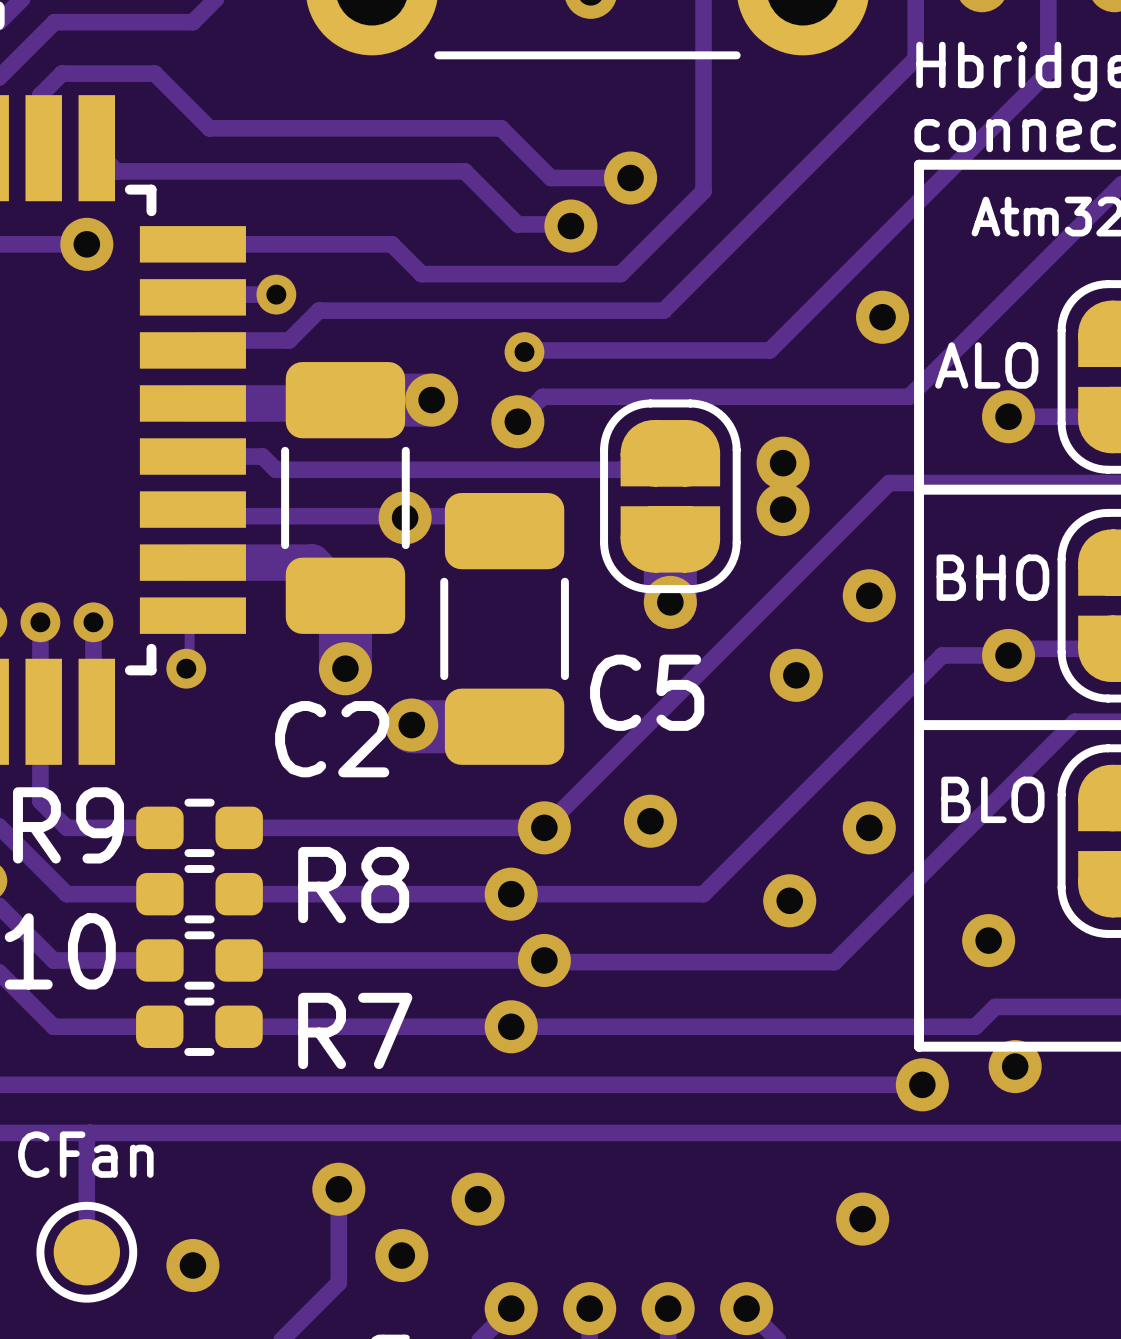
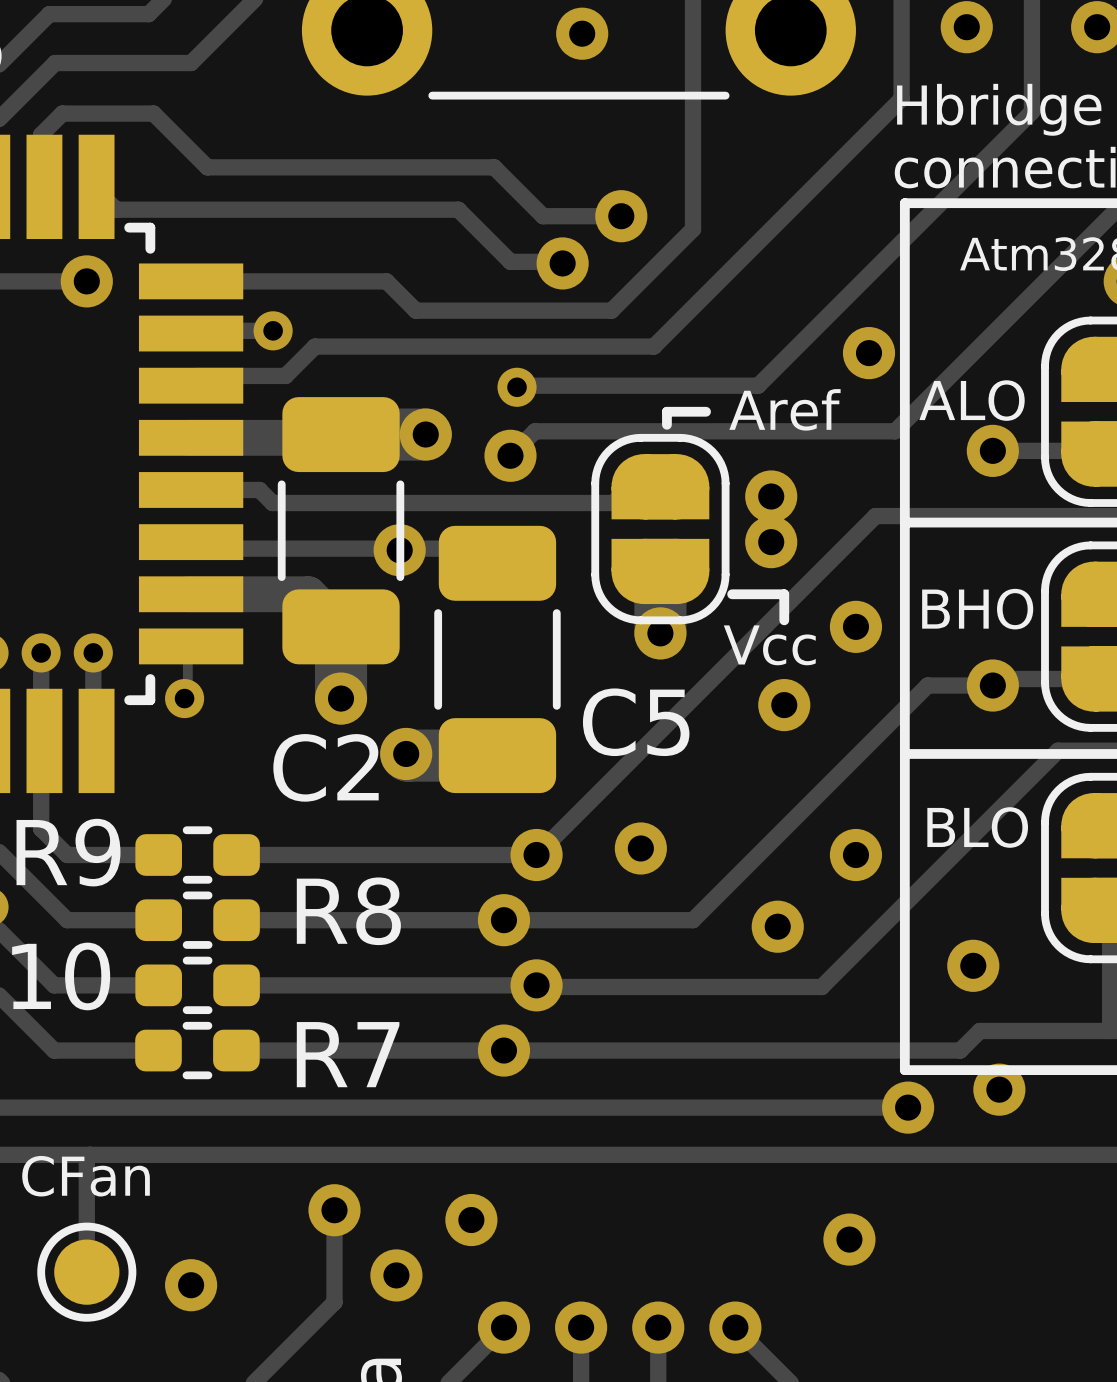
text: none -> Aref (784, 409)
line: none -> (706, 411) (666, 411) (666, 424)
line: none -> (732, 594) (784, 594) (784, 620)
text: none -> Vcc (769, 645)

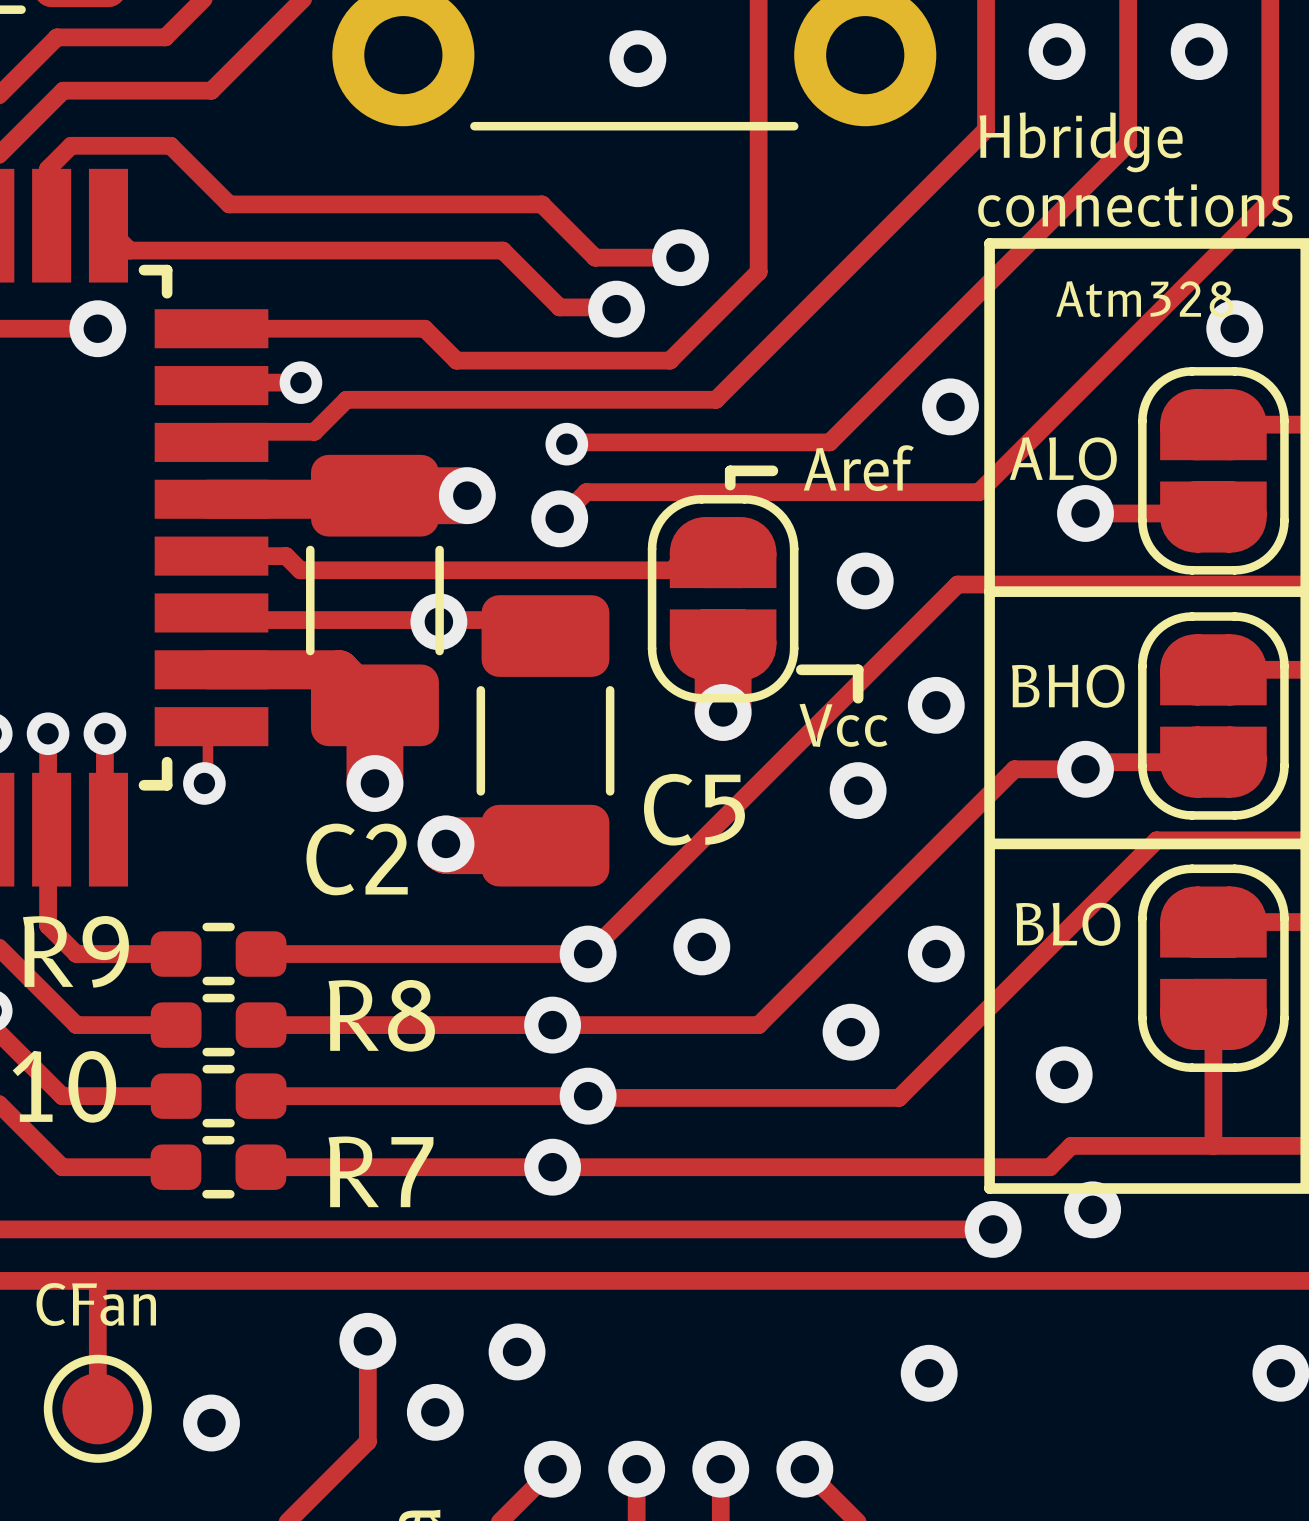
via: (771, 496) -> none
via: none -> (865, 580)
via: (771, 542) -> none

